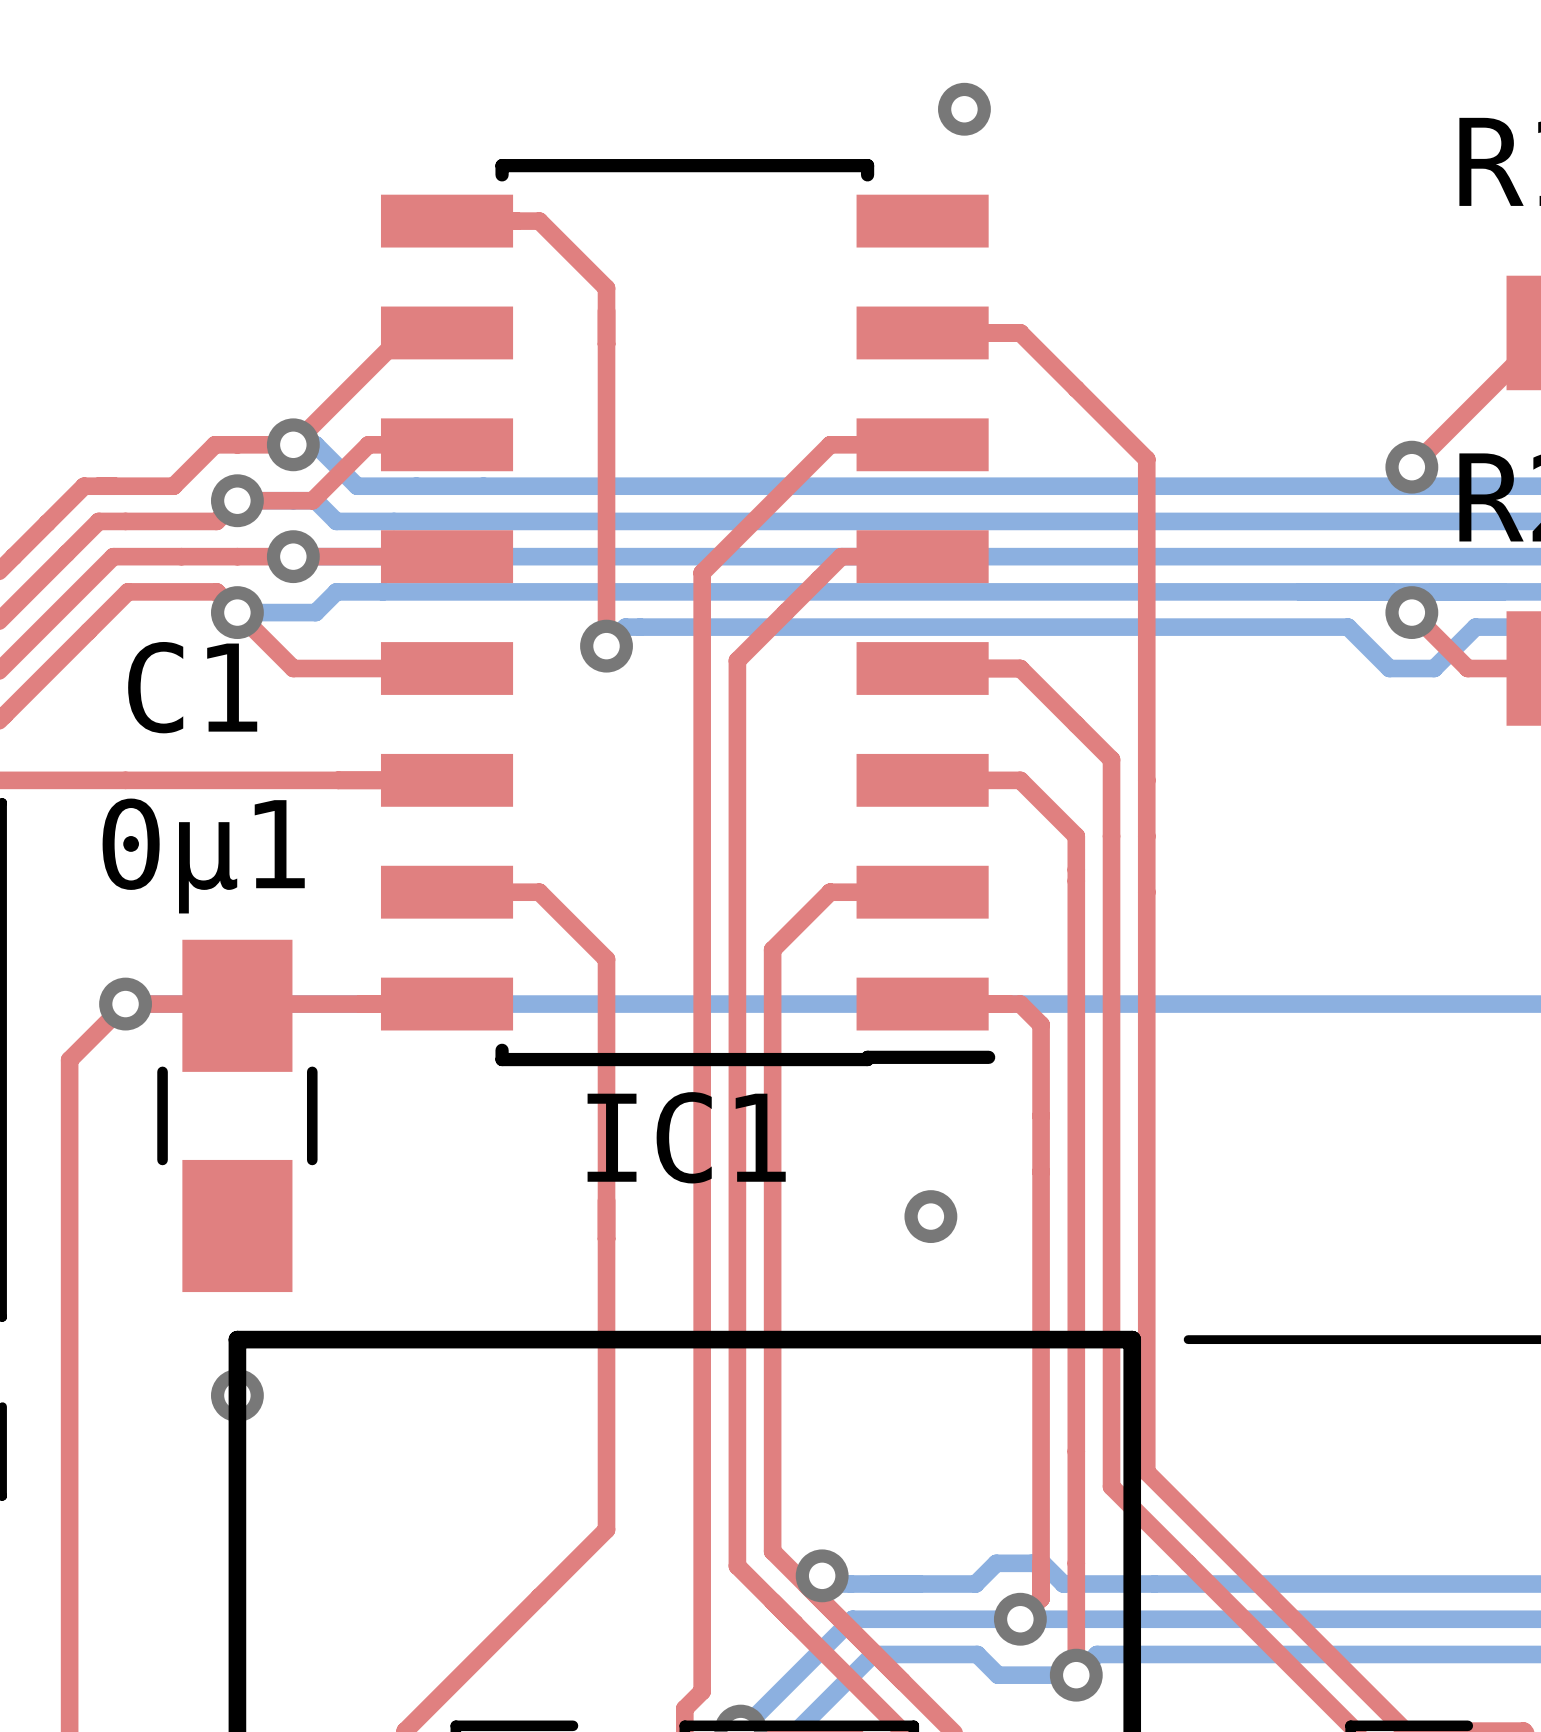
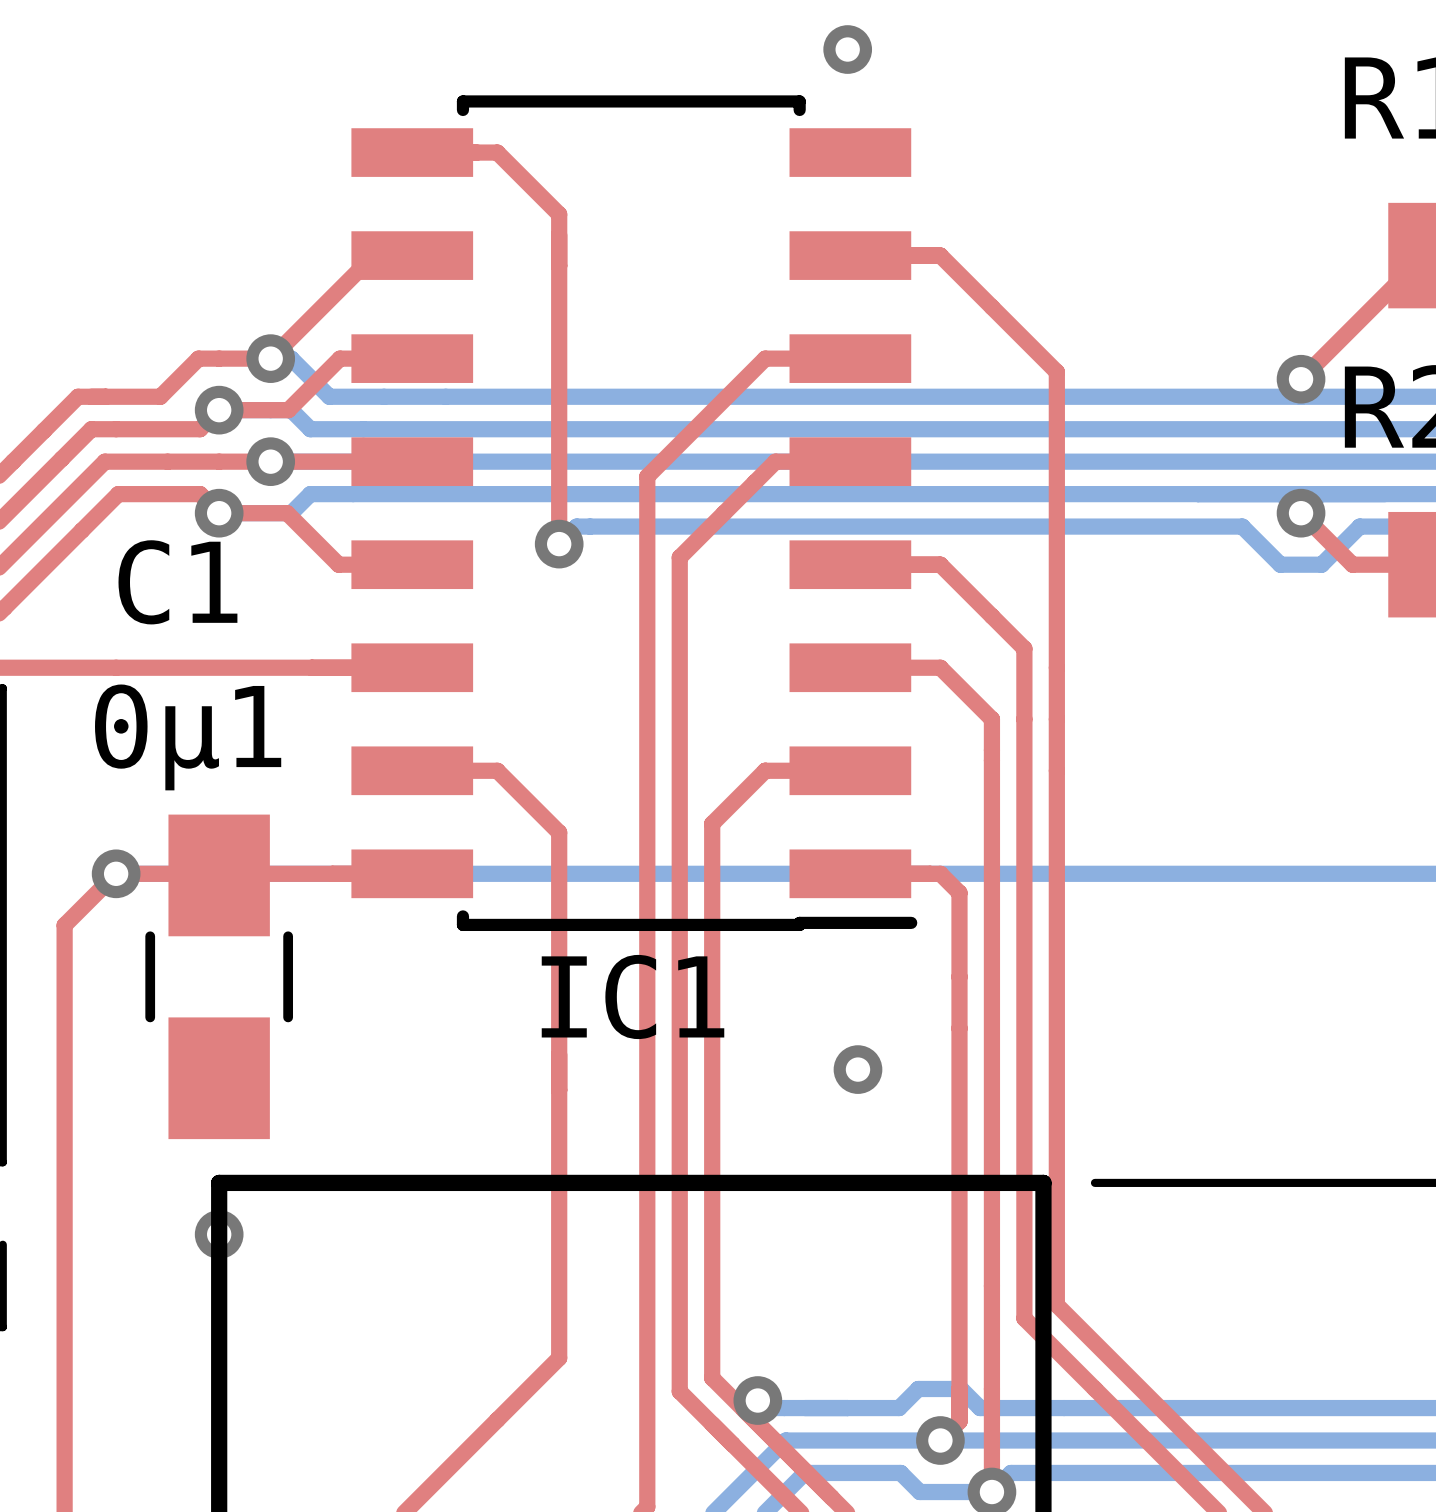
via position: (964, 109) -> (847, 49)
top track: (237, 612) (293, 668) (367, 668) -> (219, 513) (287, 513) (338, 564)

